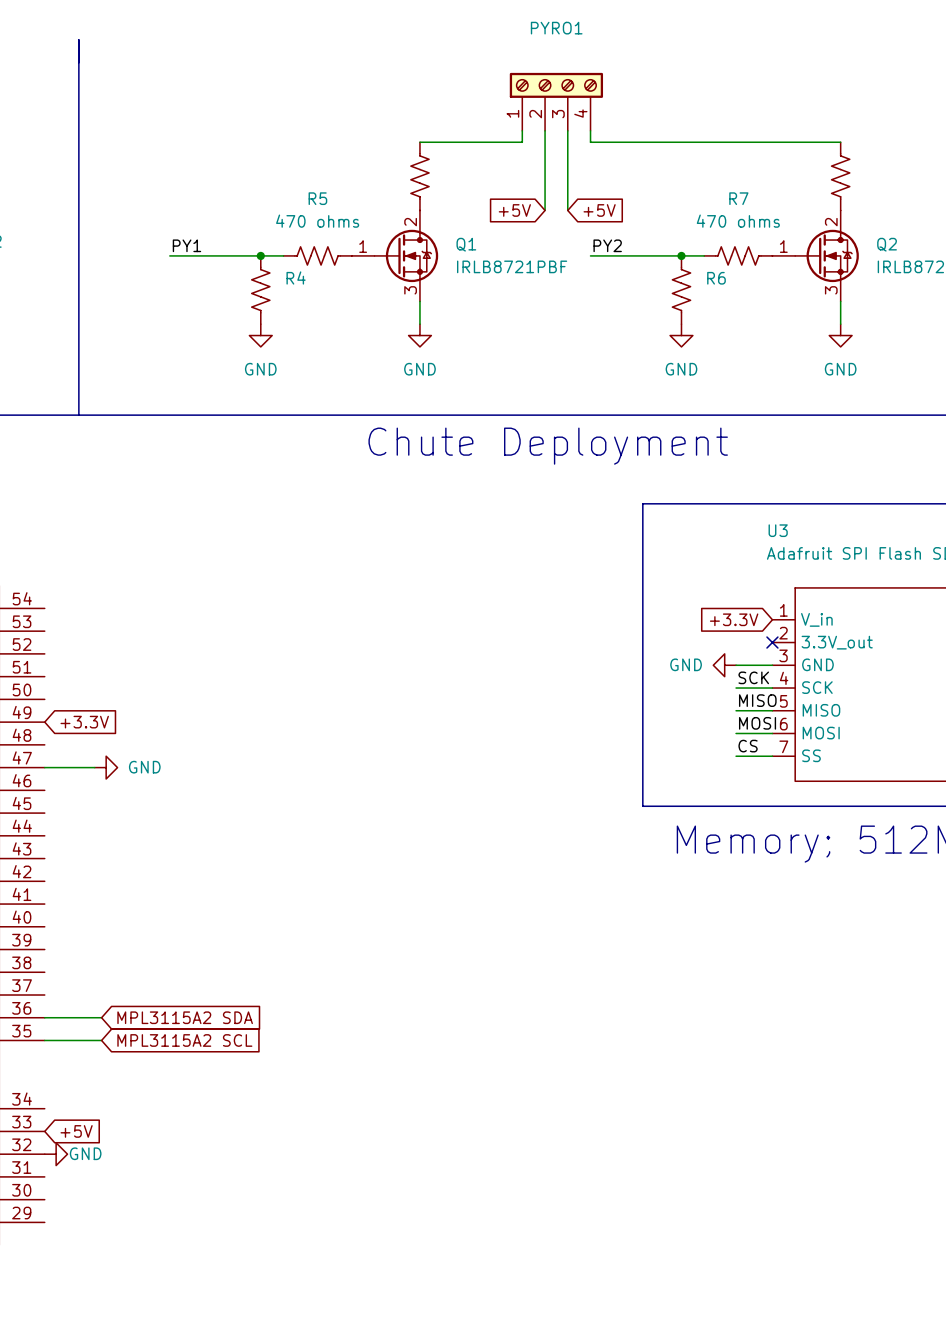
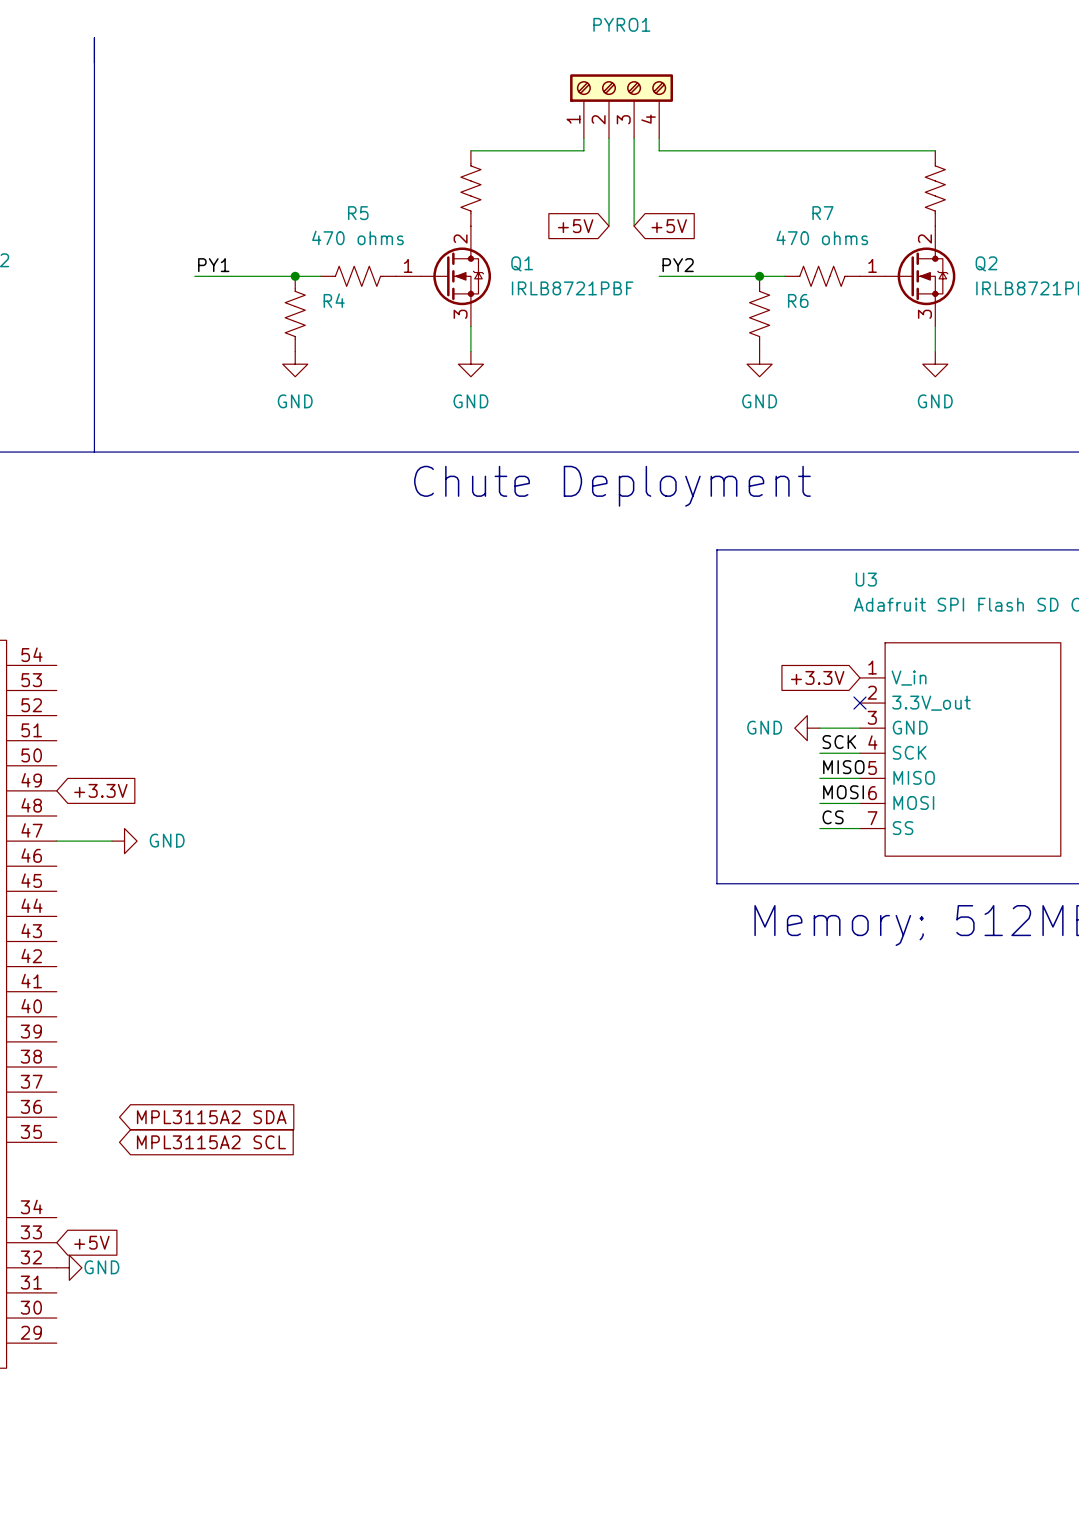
wire: (44, 1017) (101, 1017) -> none
wire: (44, 1040) (101, 1040) -> none

